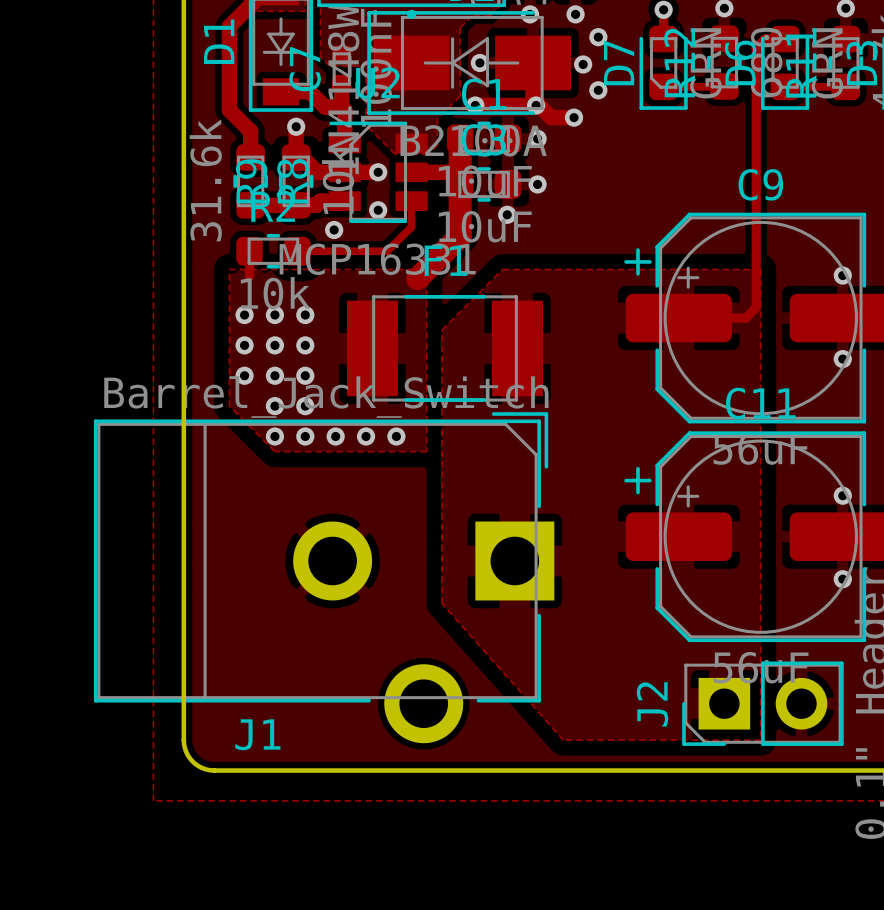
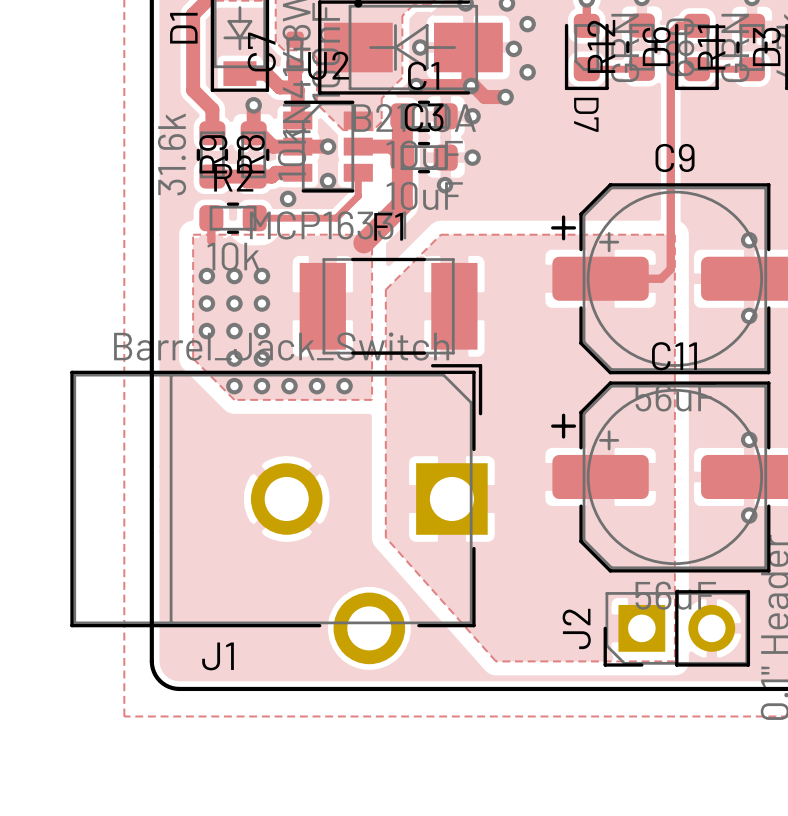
D7 name rotation: 0° (619, 63) -> 180° (586, 114)
D7 name position: D7 (619, 63) -> D7 (586, 114)

